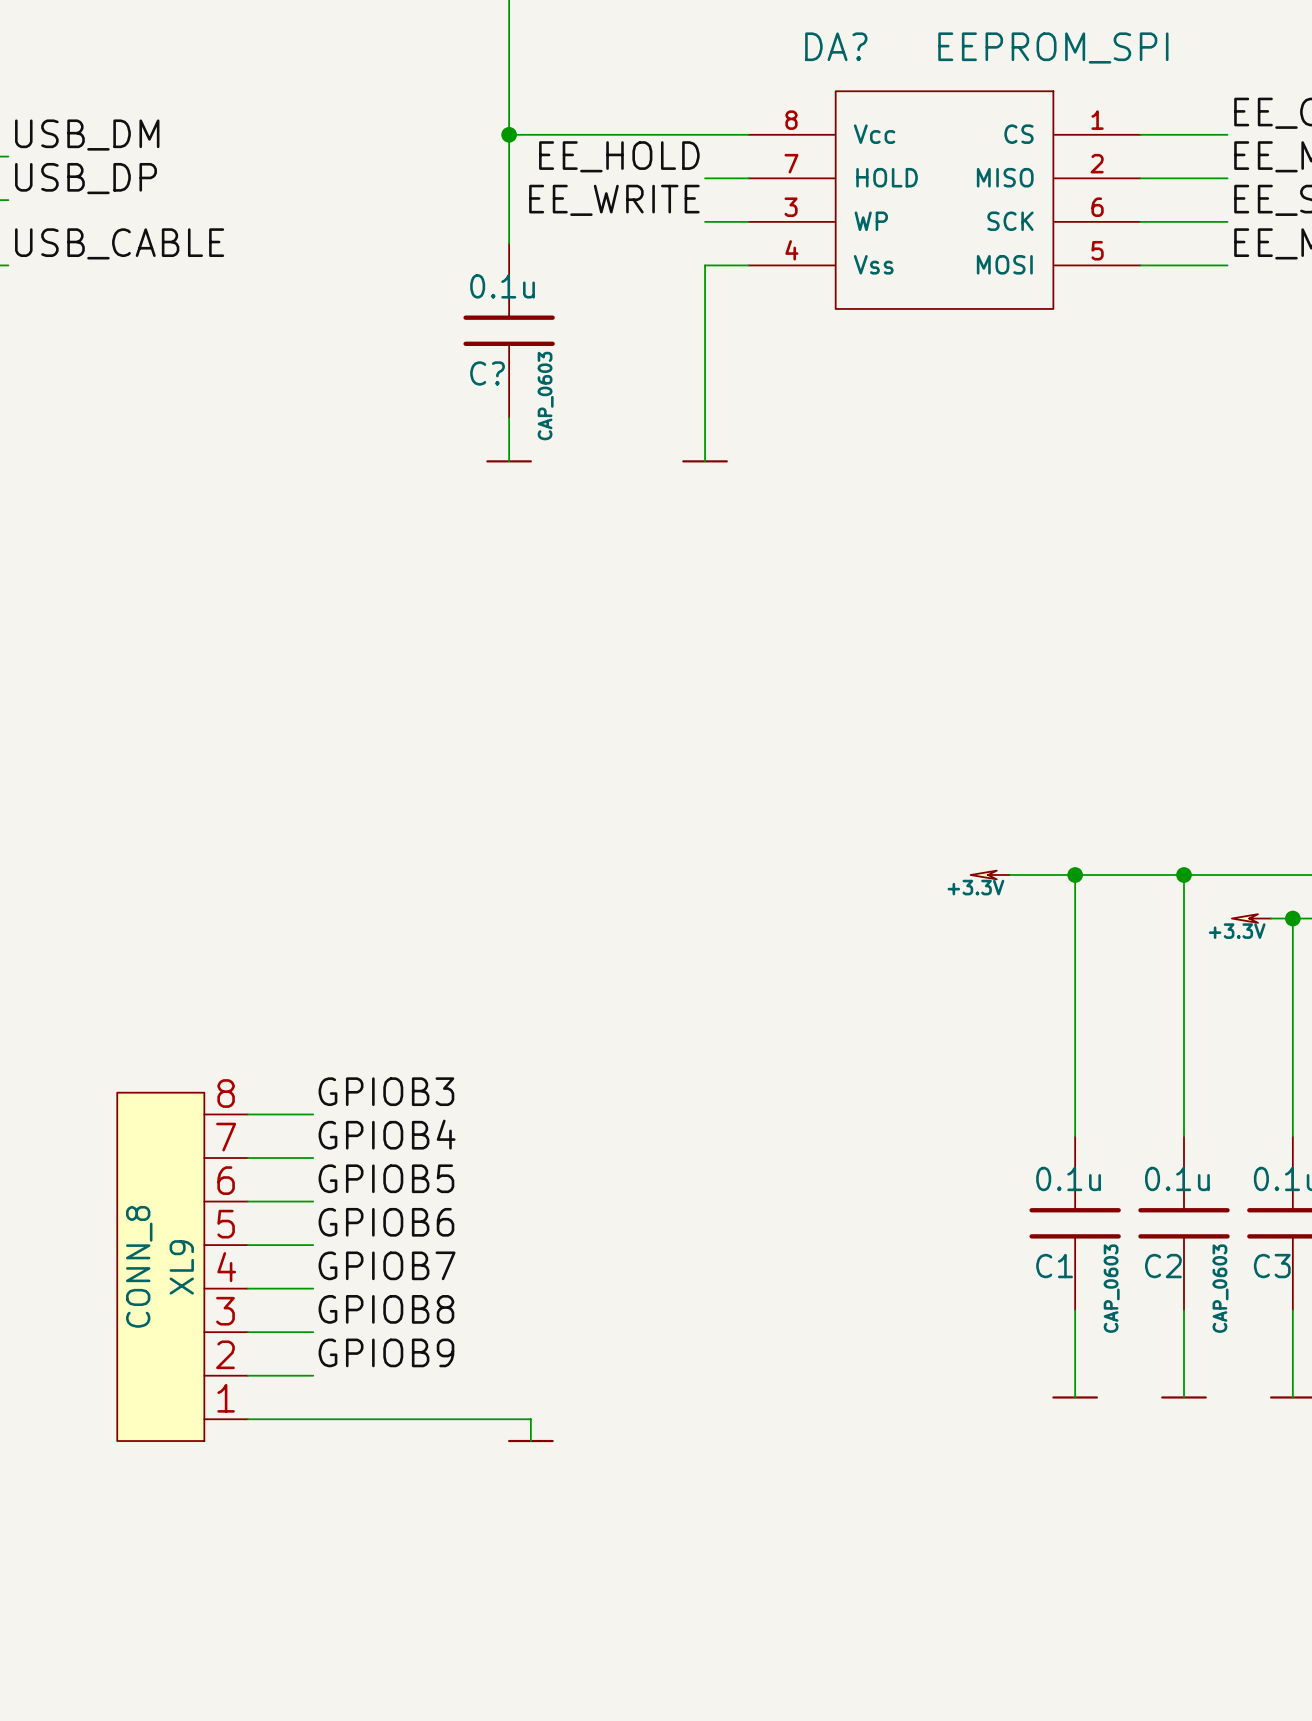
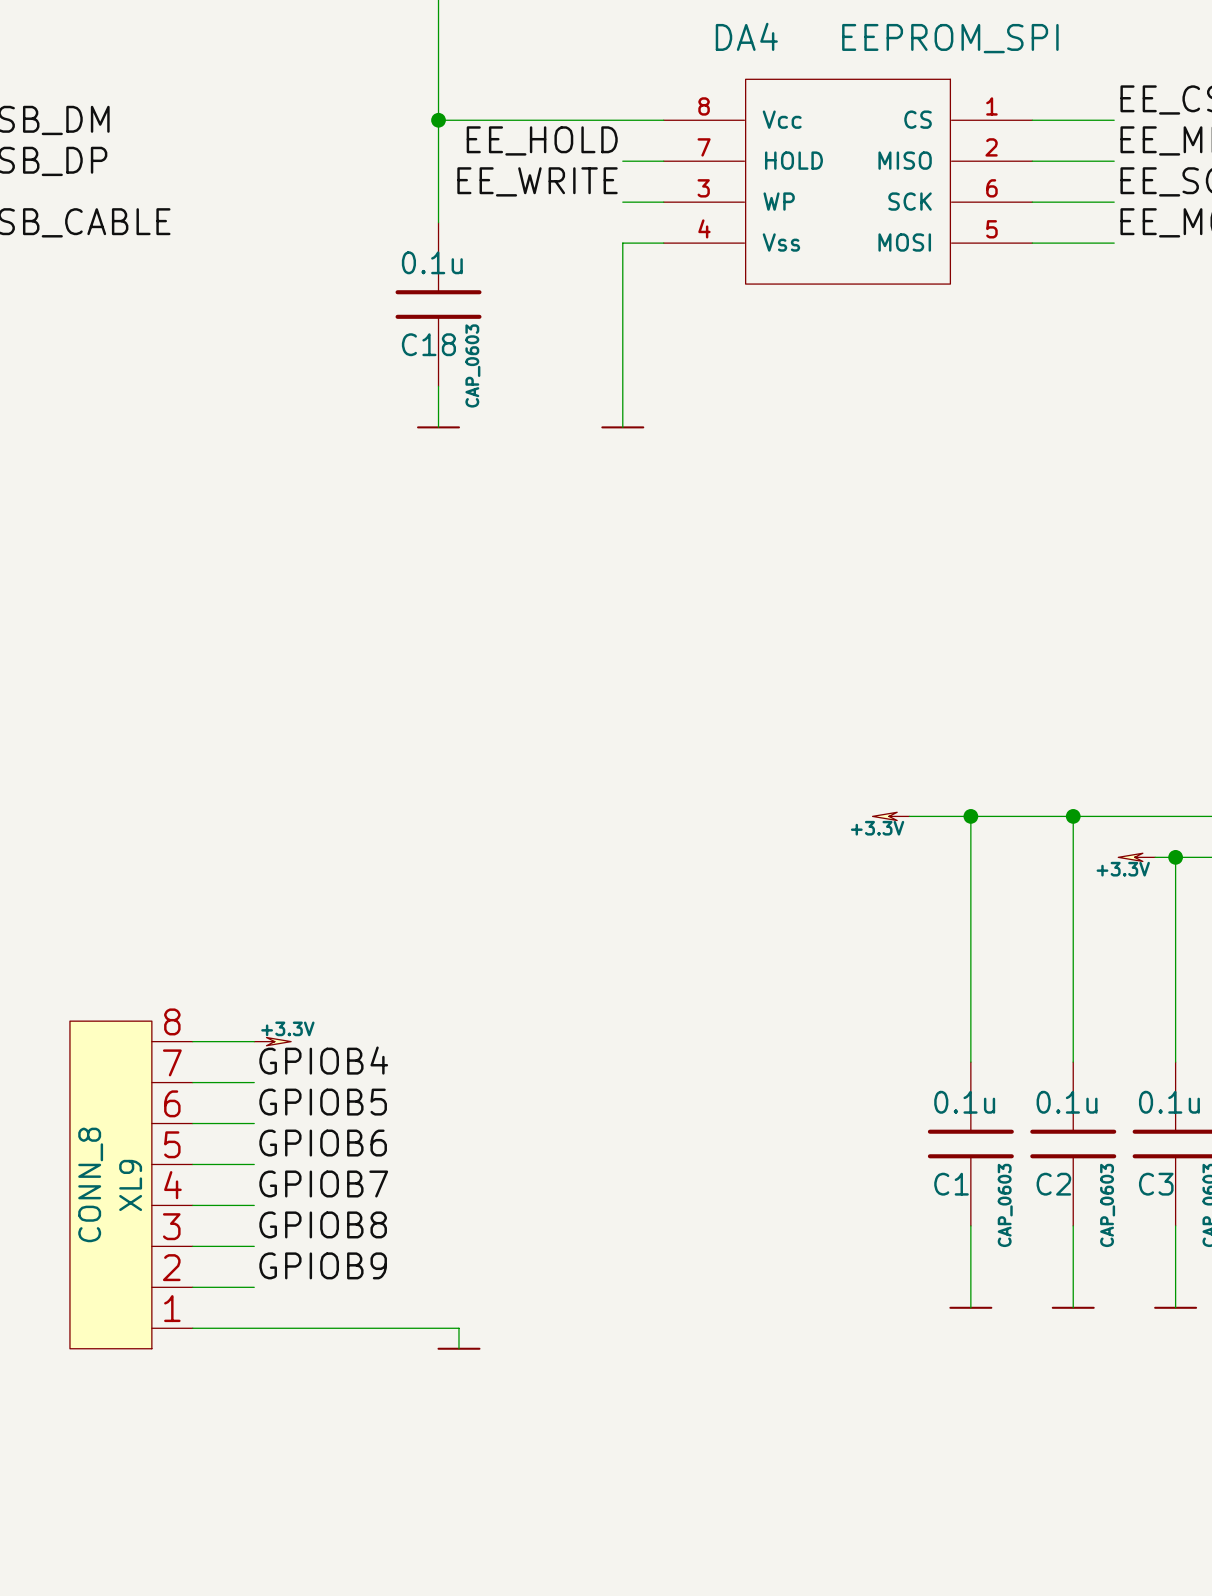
DA? name: DA? (836, 46) -> DA4 (746, 36)
C? name: C? (487, 373) -> C18 (428, 344)
label: GPIOB3 (386, 1091) -> none
power symbol: none -> +3.3V (272, 1041)

